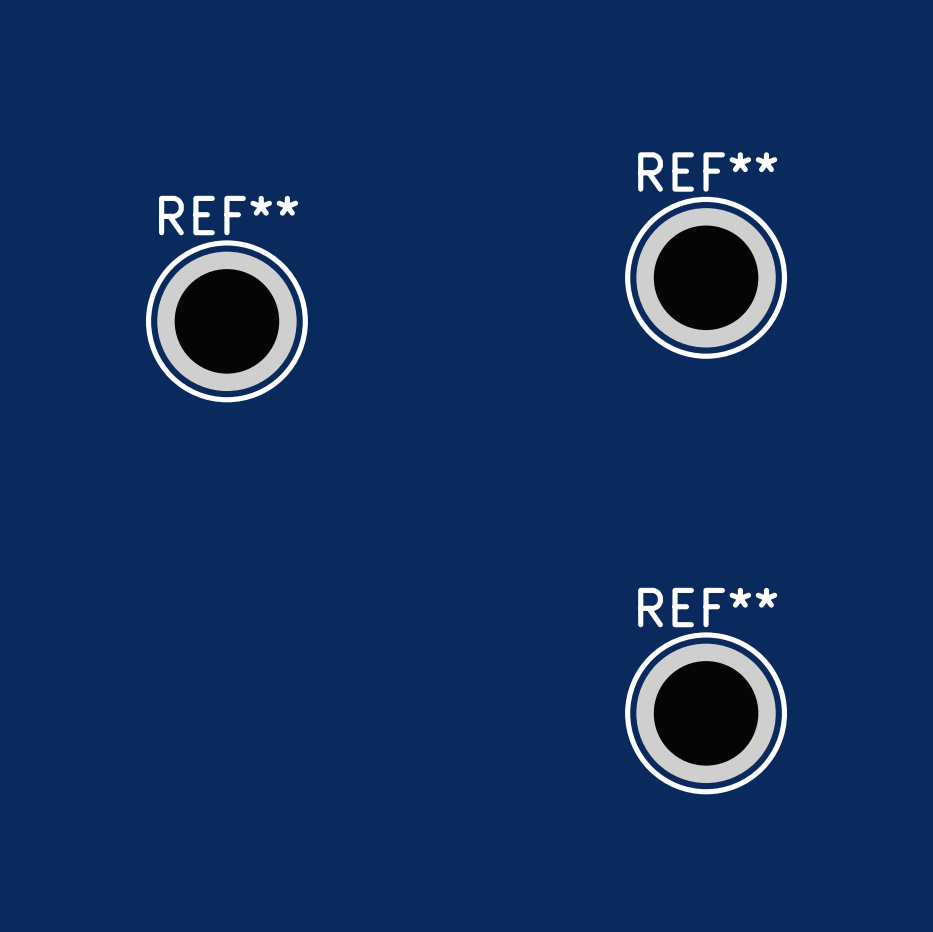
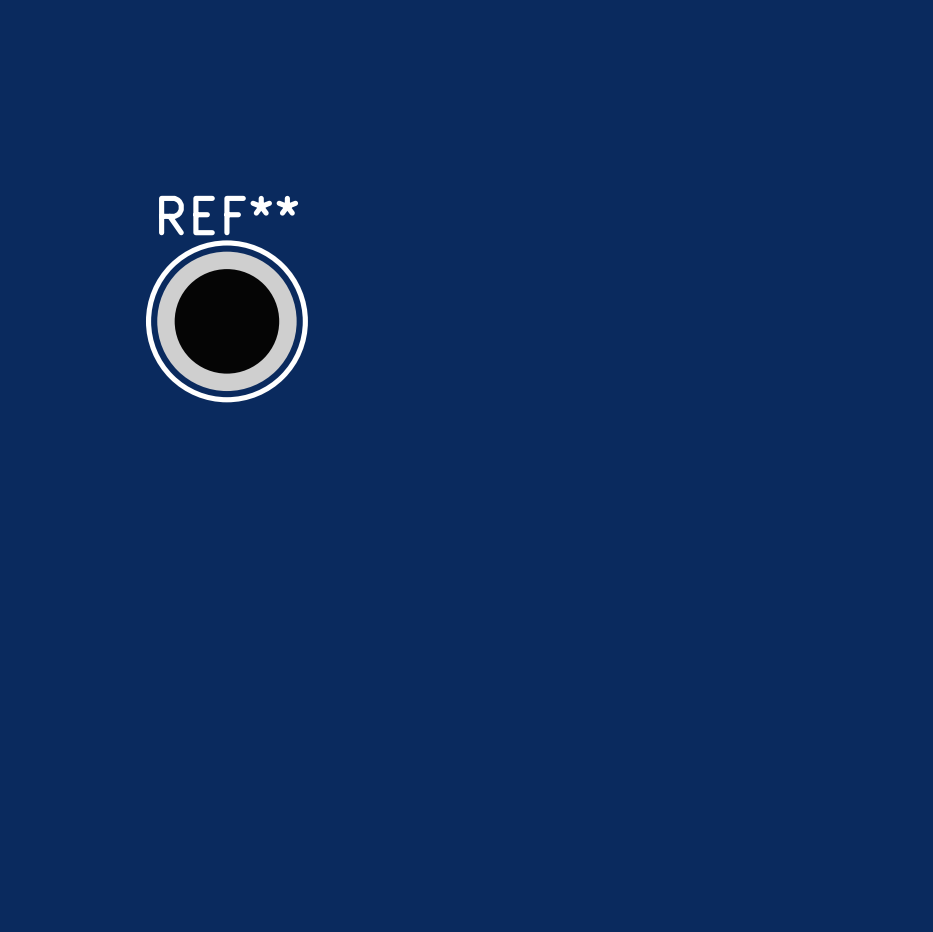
REF**: (706, 277) -> none
REF**: (706, 713) -> none

